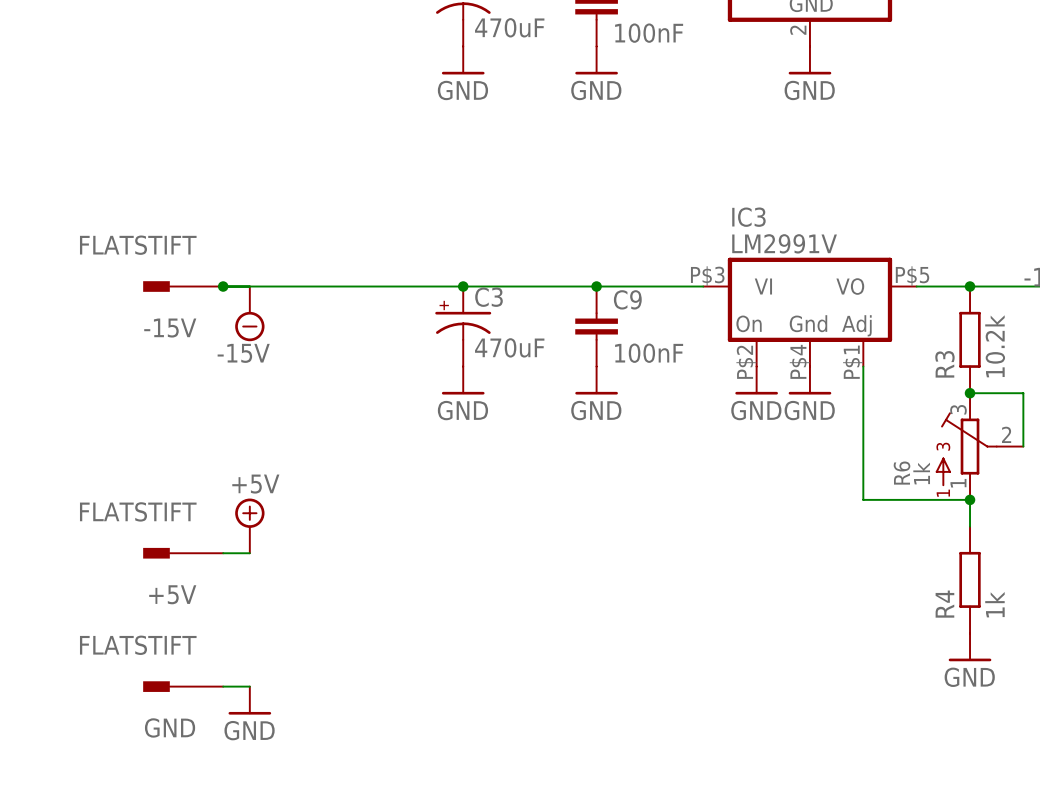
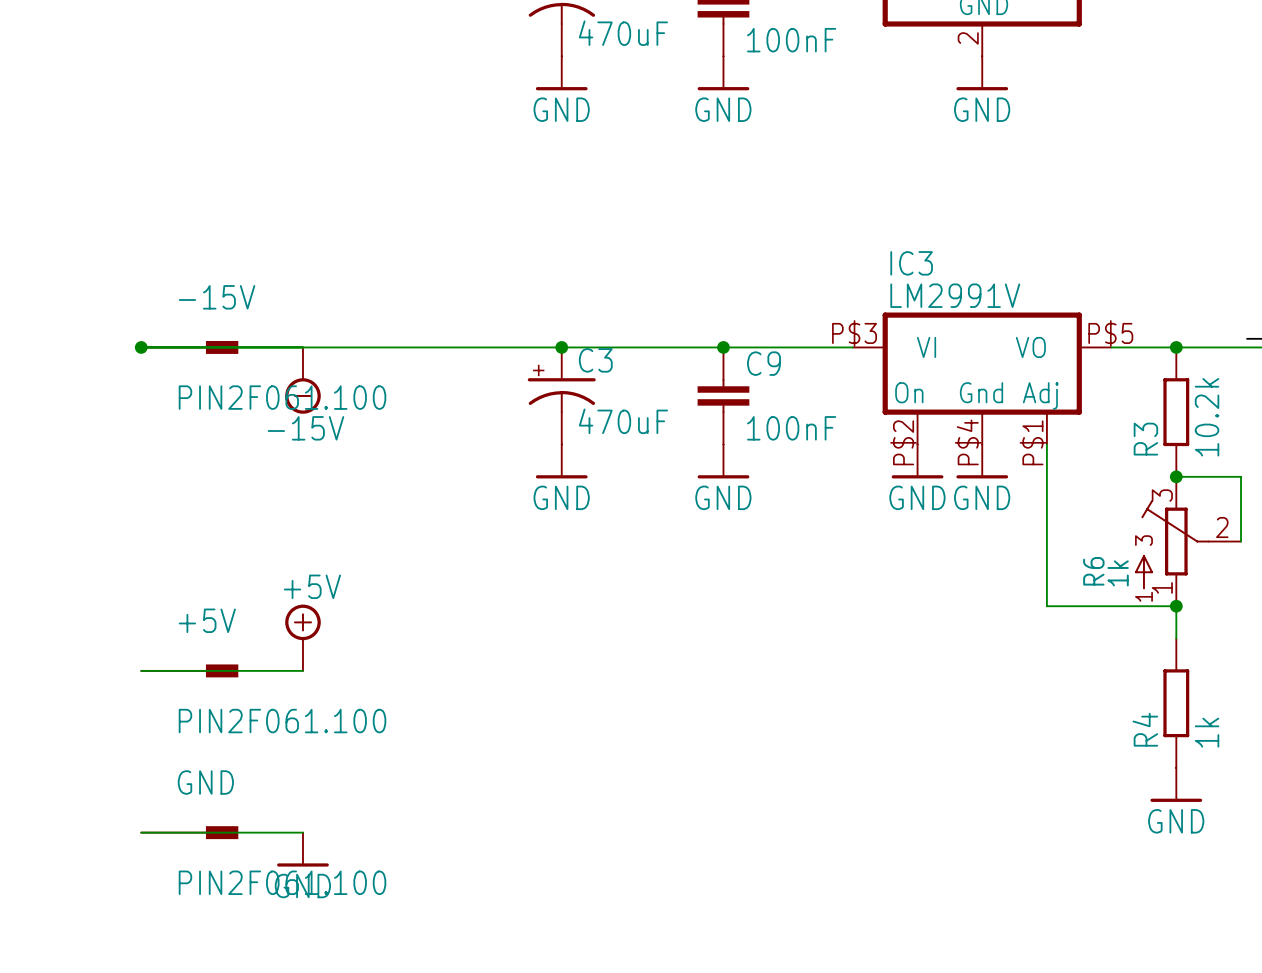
-15V value: FLATSTIFT (138, 245) -> PIN2F061.100 (282, 397)
junction: none -> (141, 347)
-15V rotation: 0° (156, 286) -> 180° (222, 347)
junction: (223, 286) -> none
+5V value: FLATSTIFT (138, 511) -> PIN2F061.100 (282, 721)
+5V rotation: 0° (156, 553) -> 180° (222, 670)
GND: none -> PIN2F061.100 (189, 832)
GND: FLATSTIFT (183, 686) -> none

